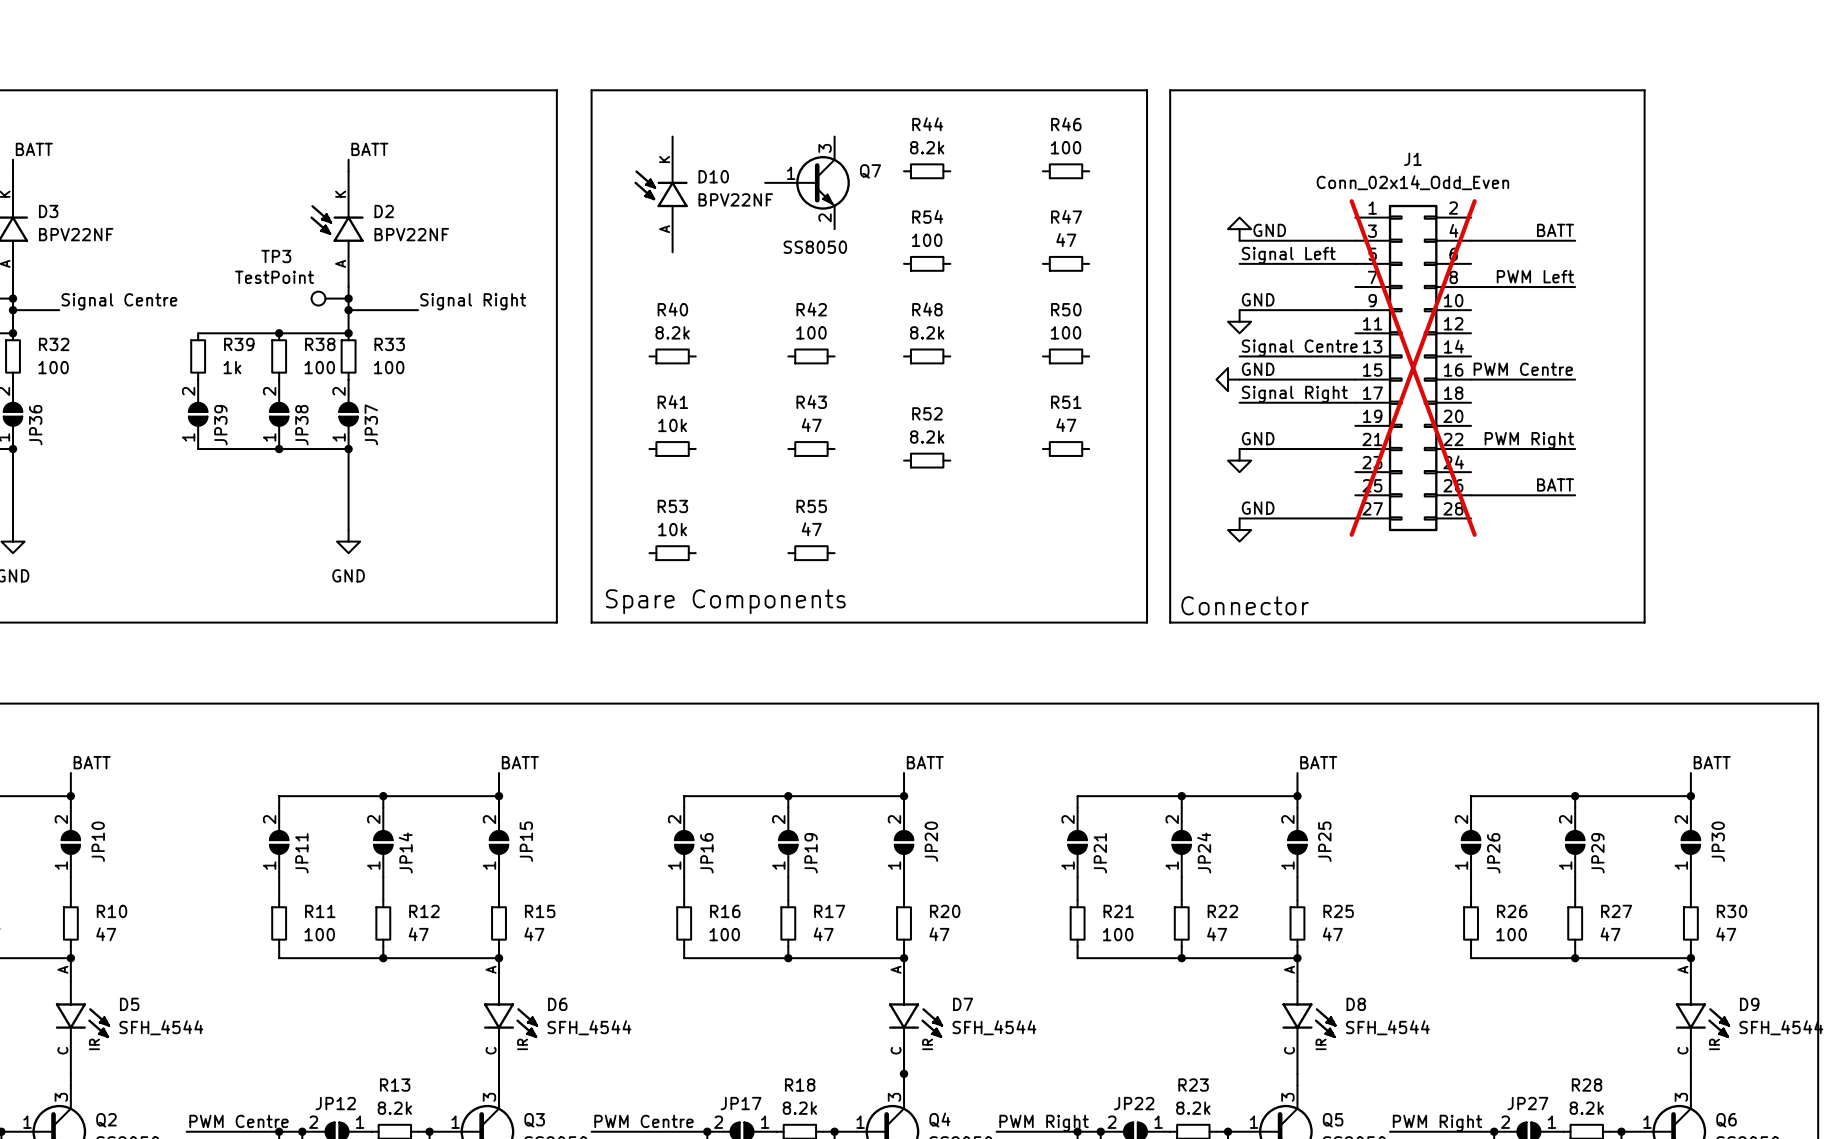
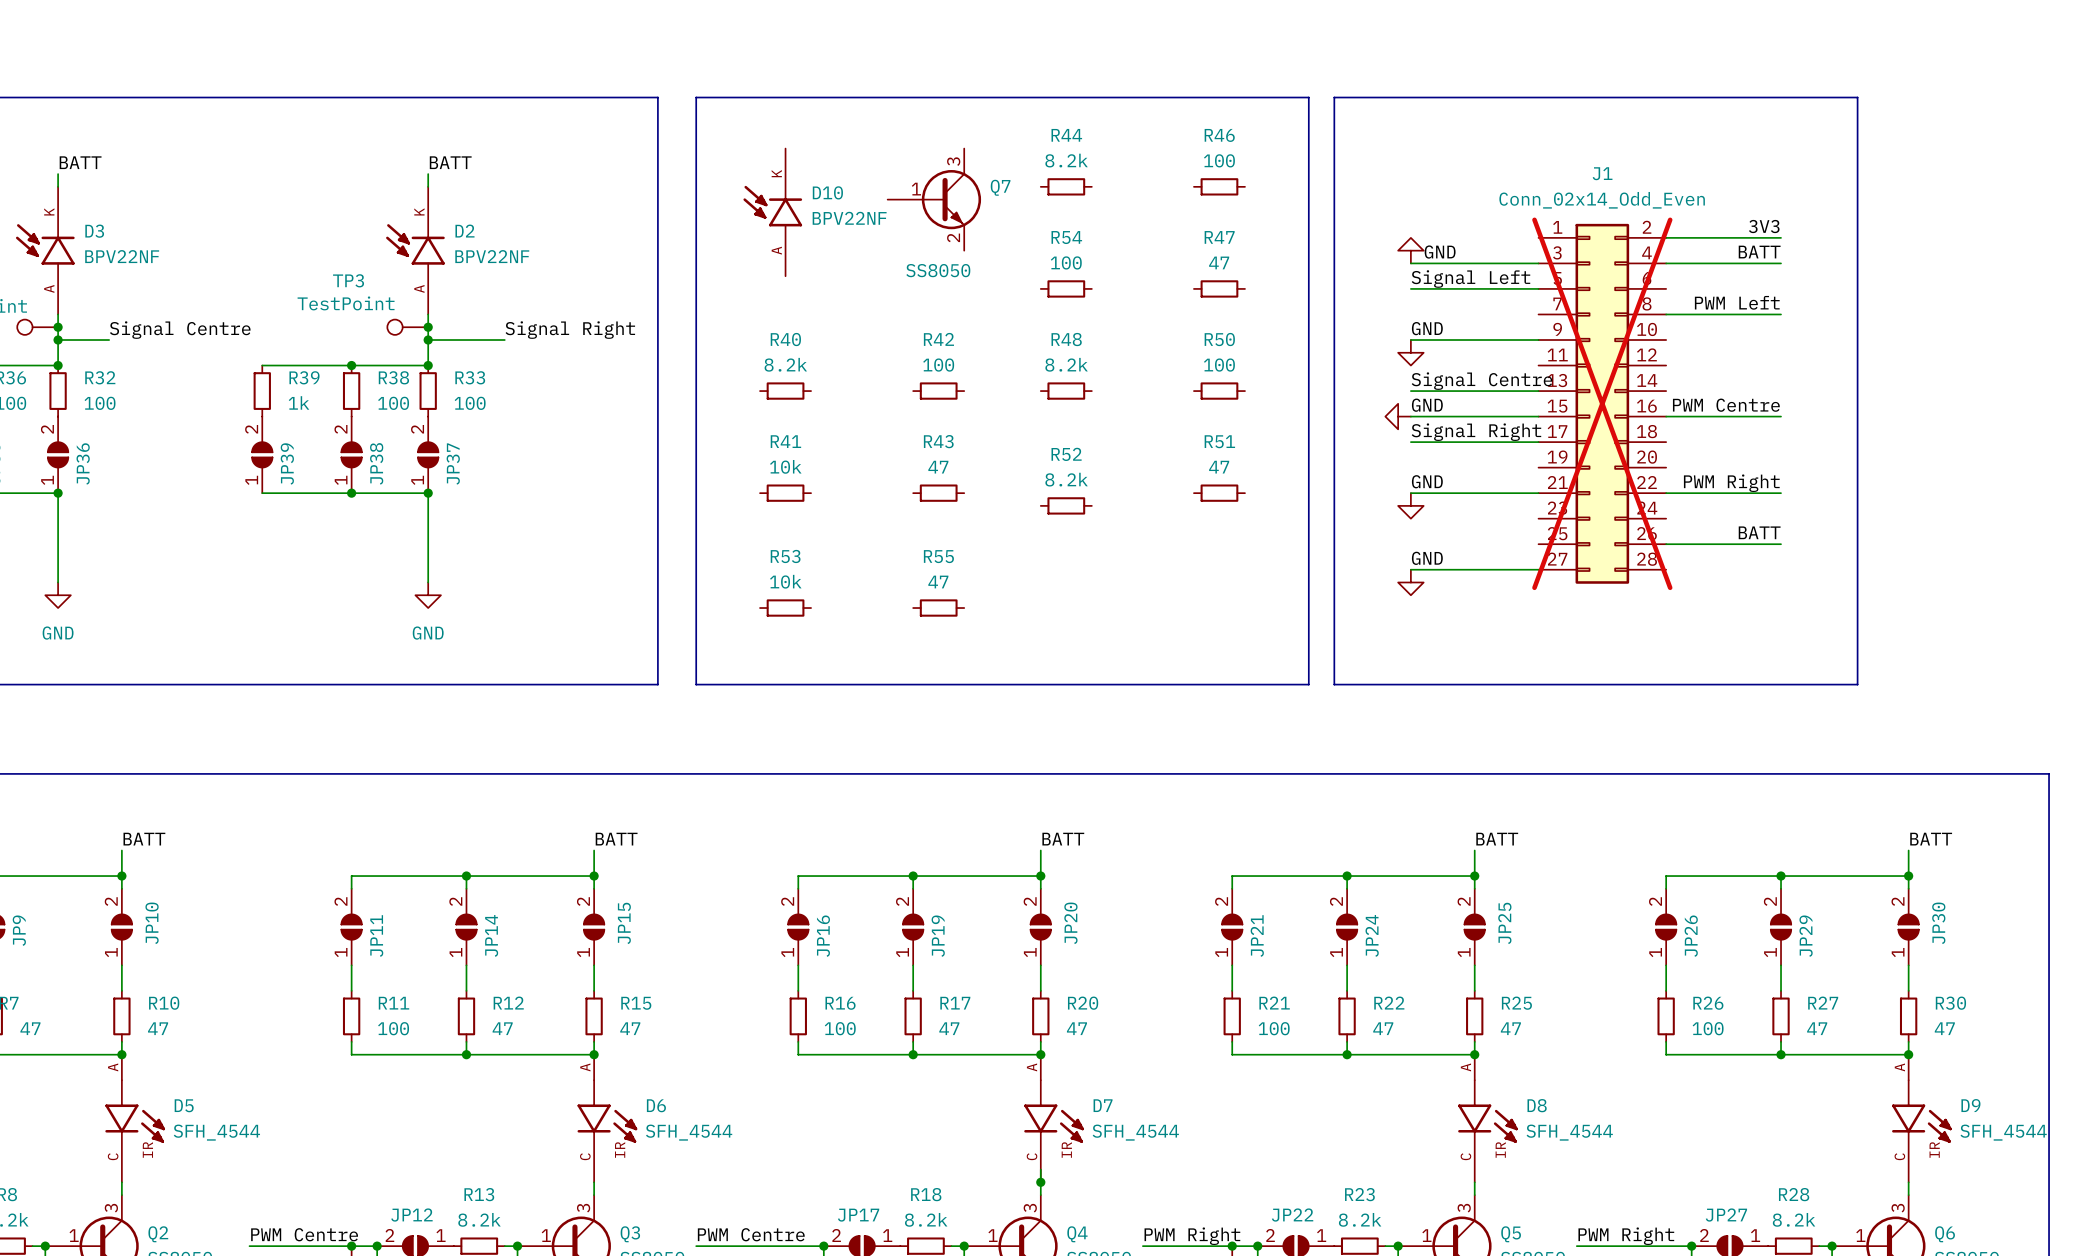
label: none -> 3V3 (1764, 226)
wire: none -> (1666, 237) (1781, 237)
text: Spare Components (725, 601) -> none
text: Connector (1245, 605) -> none

